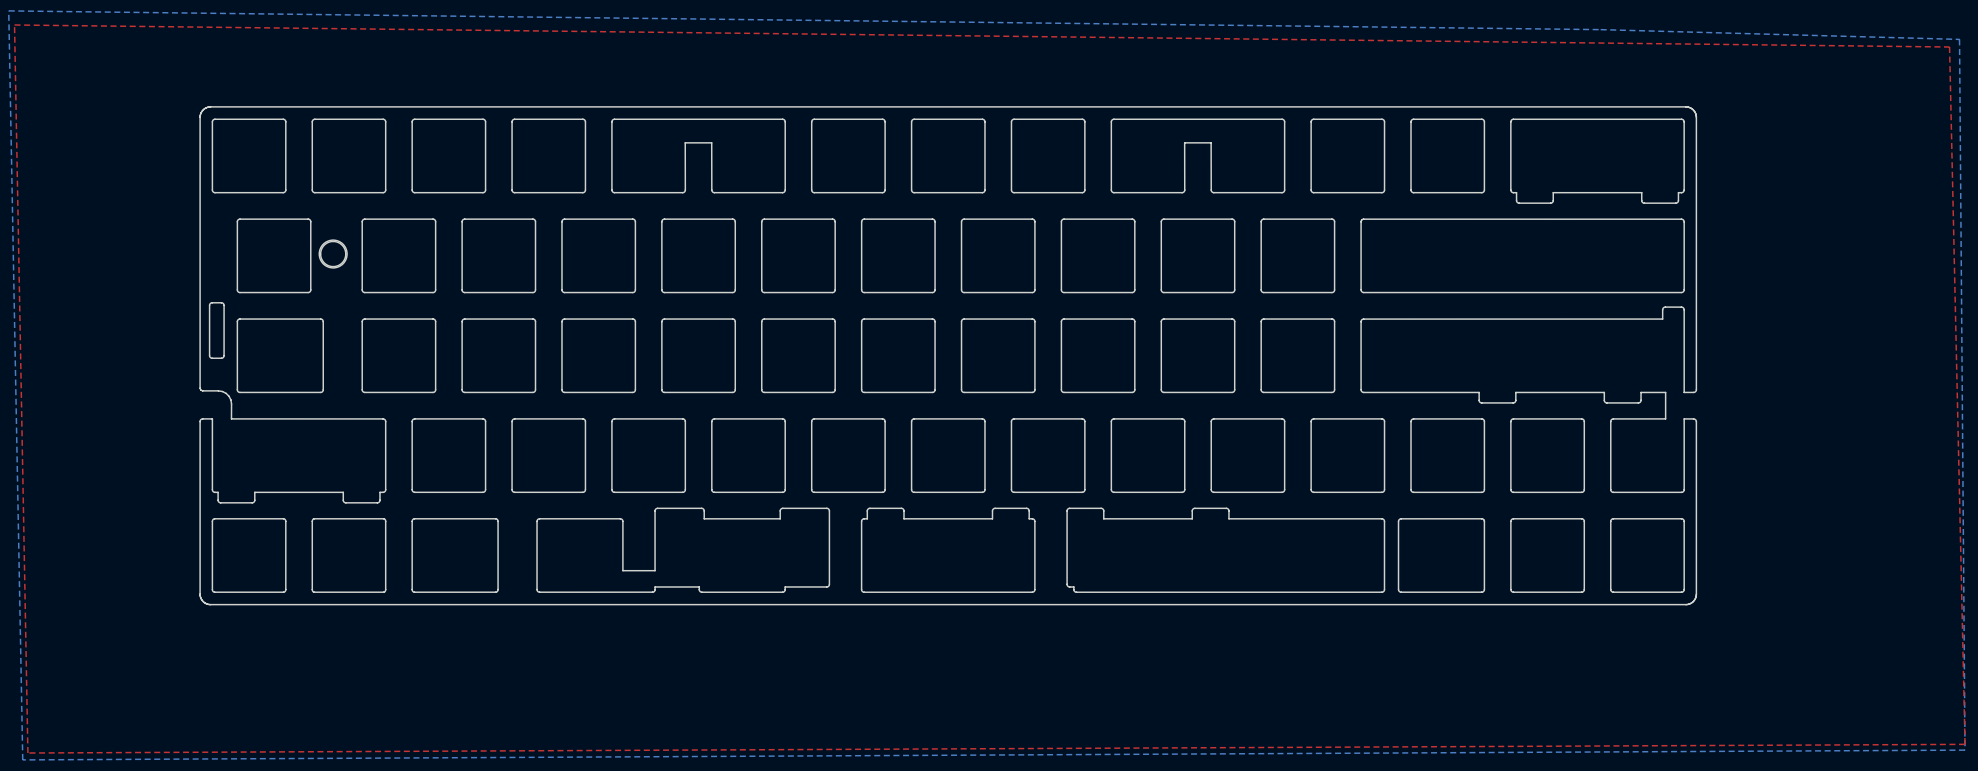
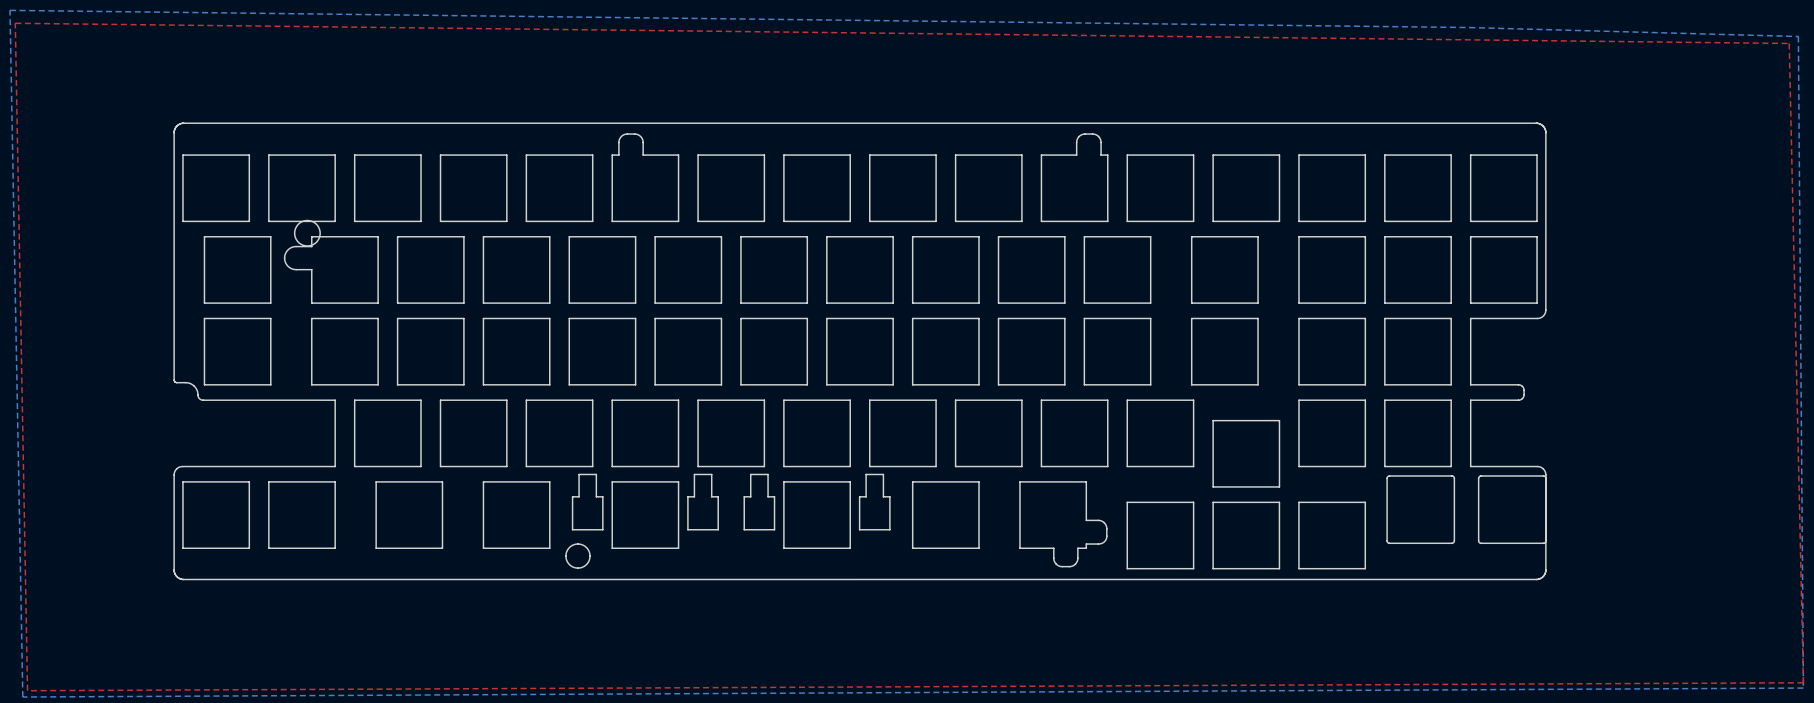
board edge: (210, 106) (1689, 107) (1694, 111) (1696, 117) (1695, 391) (1684, 392) (1684, 309) (1681, 307) (1663, 307) (1662, 319) (1363, 319) (1361, 321) (1361, 389) (1363, 392) (1479, 392) (1479, 400) (1481, 402) (1513, 402) (1515, 392) (1604, 392) (1606, 402) (1638, 402) (1640, 400) (1641, 392) (1665, 392) (1665, 418) (1611, 420) (1610, 489) (1613, 492) (1683, 491) (1684, 418) (1695, 419) (1695, 597) (1692, 602) (1685, 604) (207, 604) (202, 600) (200, 594) (201, 419) (212, 418) (212, 489) (218, 492) (219, 502) (252, 502) (254, 492) (343, 492) (345, 502) (377, 502) (379, 500) (379, 492) (384, 492) (385, 489) (384, 419) (231, 418) (230, 399) (226, 393) (200, 390) (200, 117) (203, 109) (210, 106) -> (182, 123) (176, 126) (174, 132) (174, 381) (192, 384) (196, 389) (198, 397) (202, 400) (335, 400) (335, 466) (182, 466) (177, 468) (174, 474) (174, 569) (175, 575) (180, 579) (1536, 579) (1541, 577) (1545, 572) (1545, 475) (1544, 469) (1537, 466) (1470, 466) (1470, 400) (1519, 400) (1524, 394) (1523, 387) (1519, 384) (1470, 384) (1470, 318) (1538, 318) (1542, 316) (1545, 311) (1545, 132) (1544, 127) (1539, 123) (182, 123)
board edge: (215, 119) (285, 120) (285, 191) (213, 191) (212, 121) (215, 119) -> none
board edge: (314, 119) (384, 120) (384, 191) (313, 191) (312, 121) (314, 119) -> none
board edge: (414, 119) (484, 120) (484, 191) (412, 191) (412, 121) (414, 119) -> none
board edge: (514, 119) (584, 120) (584, 191) (512, 191) (512, 121) (514, 119) -> none
board edge: (614, 119) (783, 119) (785, 121) (785, 191) (782, 192) (713, 192) (711, 190) (711, 142) (685, 142) (684, 192) (613, 192) (611, 190) (611, 121) (614, 119) -> none
board edge: (814, 119) (884, 120) (884, 191) (812, 191) (811, 121) (814, 119) -> none
board edge: (914, 119) (984, 120) (984, 191) (912, 191) (911, 121) (914, 119) -> none
board edge: (1014, 119) (1084, 120) (1084, 191) (1012, 191) (1011, 121) (1014, 119) -> none
board edge: (1113, 119) (1283, 119) (1284, 121) (1284, 191) (1282, 192) (1212, 192) (1211, 190) (1211, 142) (1184, 142) (1183, 192) (1112, 192) (1111, 190) (1111, 121) (1113, 119) -> none
board edge: (1313, 119) (1383, 120) (1383, 191) (1311, 191) (1311, 121) (1313, 119) -> none
board edge: (1413, 119) (1483, 120) (1483, 191) (1411, 191) (1411, 121) (1413, 119) -> none
board edge: (1513, 119) (1682, 119) (1684, 121) (1683, 191) (1678, 192) (1678, 201) (1676, 203) (1643, 203) (1641, 192) (1553, 192) (1551, 203) (1518, 202) (1516, 192) (1510, 190) (1510, 121) (1513, 119) -> none
board edge: none -> (627, 134) (636, 134) (641, 137) (643, 155) (678, 155) (678, 221) (612, 221) (612, 155) (618, 155) (619, 139) (627, 134)
board edge: none -> (1085, 134) (1098, 136) (1100, 141) (1101, 155) (1107, 155) (1107, 221) (1041, 221) (1041, 155) (1076, 155) (1077, 139) (1085, 134)
board edge: none -> (182, 155) (182, 221) (249, 221) (249, 155) (182, 155)
board edge: none -> (268, 155) (268, 221) (335, 221) (335, 155) (268, 155)
board edge: none -> (354, 155) (354, 221) (421, 221) (421, 155) (354, 155)
board edge: none -> (440, 155) (440, 221) (506, 221) (506, 155) (440, 155)
board edge: none -> (526, 155) (526, 221) (592, 221) (592, 155) (526, 155)
board edge: none -> (698, 155) (698, 221) (764, 221) (764, 155) (698, 155)
board edge: none -> (783, 155) (783, 221) (850, 221) (850, 155) (783, 155)
board edge: none -> (869, 155) (869, 221) (936, 221) (936, 155) (869, 155)
board edge: none -> (955, 155) (955, 221) (1021, 221) (1021, 155) (955, 155)
board edge: none -> (1127, 155) (1127, 221) (1193, 221) (1193, 155) (1127, 155)
board edge: none -> (1213, 155) (1213, 221) (1279, 221) (1279, 155) (1213, 155)
board edge: none -> (1298, 155) (1298, 221) (1365, 221) (1365, 155) (1298, 155)
board edge: none -> (1384, 155) (1384, 221) (1451, 221) (1451, 155) (1384, 155)
board edge: none -> (1470, 155) (1470, 221) (1537, 221) (1537, 155) (1470, 155)
board edge: (239, 219) (310, 219) (310, 291) (238, 291) (237, 221) (239, 219) -> none
board edge: (364, 219) (434, 219) (434, 291) (362, 291) (362, 221) (364, 219) -> none
board edge: (464, 219) (534, 219) (534, 291) (462, 291) (462, 221) (464, 219) -> none
board edge: (564, 219) (634, 219) (634, 291) (562, 291) (561, 221) (564, 219) -> none
board edge: (664, 219) (734, 219) (734, 291) (662, 291) (661, 221) (664, 219) -> none
board edge: (764, 219) (834, 219) (834, 291) (762, 291) (761, 221) (764, 219) -> none
board edge: (864, 219) (934, 219) (934, 291) (862, 291) (861, 221) (864, 219) -> none
board edge: (964, 219) (1034, 219) (1034, 291) (962, 291) (961, 221) (964, 219) -> none
board edge: (1064, 219) (1134, 219) (1134, 291) (1062, 291) (1061, 221) (1064, 219) -> none
board edge: (1163, 219) (1233, 219) (1233, 291) (1162, 291) (1161, 221) (1163, 219) -> none
board edge: (1263, 219) (1333, 219) (1333, 291) (1261, 291) (1261, 221) (1263, 219) -> none
board edge: (1363, 219) (1361, 221) (1361, 289) (1363, 292) (1681, 292) (1684, 290) (1684, 221) (1681, 219) (1363, 219) -> none
board edge: (333, 241) (342, 245) (345, 254) (342, 262) (333, 266) (324, 262) (320, 254) (324, 245) (333, 241) -> none
board edge: none -> (204, 236) (270, 236) (270, 303) (204, 303) (204, 236)
board edge: none -> (311, 236) (378, 236) (378, 303) (311, 303) (311, 269) (291, 268) (286, 264) (284, 258) (286, 251) (291, 247) (311, 246) (311, 236)
board edge: none -> (397, 236) (397, 303) (463, 303) (463, 236) (397, 236)
board edge: none -> (483, 236) (549, 236) (549, 303) (483, 303) (483, 236)
board edge: none -> (569, 236) (635, 236) (635, 303) (569, 303) (569, 236)
board edge: none -> (655, 236) (721, 236) (721, 303) (655, 303) (655, 236)
board edge: none -> (740, 236) (807, 236) (807, 303) (740, 303) (740, 236)
board edge: none -> (826, 236) (893, 236) (893, 303) (826, 303) (826, 236)
board edge: none -> (912, 236) (912, 303) (979, 303) (979, 236) (912, 236)
board edge: none -> (998, 236) (1064, 236) (1064, 303) (998, 303) (998, 236)
board edge: none -> (1084, 236) (1150, 236) (1150, 303) (1084, 303) (1084, 236)
board edge: none -> (1191, 236) (1258, 236) (1258, 303) (1191, 303) (1191, 236)
board edge: none -> (1299, 236) (1365, 236) (1365, 303) (1299, 303) (1299, 236)
board edge: none -> (1384, 236) (1451, 236) (1451, 303) (1384, 303) (1384, 236)
board edge: none -> (1470, 236) (1537, 236) (1537, 303) (1470, 303) (1470, 236)
board edge: (212, 302) (209, 305) (209, 356) (211, 358) (221, 358) (224, 355) (224, 304) (221, 302) (212, 302) -> none
board edge: (239, 319) (322, 319) (322, 391) (238, 391) (237, 321) (239, 319) -> none
board edge: (364, 319) (434, 319) (434, 391) (362, 391) (362, 321) (364, 319) -> none
board edge: (464, 319) (534, 319) (534, 391) (462, 391) (462, 321) (464, 319) -> none
board edge: (564, 319) (634, 319) (634, 391) (562, 391) (561, 321) (564, 319) -> none
board edge: (664, 319) (734, 319) (734, 391) (662, 391) (661, 321) (664, 319) -> none
board edge: (764, 319) (834, 319) (834, 391) (762, 391) (761, 321) (764, 319) -> none
board edge: (864, 319) (934, 319) (934, 391) (862, 391) (861, 321) (864, 319) -> none
board edge: (964, 319) (1034, 319) (1034, 391) (962, 391) (961, 321) (964, 319) -> none
board edge: (1064, 319) (1134, 319) (1134, 391) (1062, 391) (1061, 321) (1064, 319) -> none
board edge: (1163, 319) (1233, 319) (1233, 391) (1162, 391) (1161, 321) (1163, 319) -> none
board edge: (1263, 319) (1333, 319) (1333, 391) (1261, 391) (1261, 321) (1263, 319) -> none
board edge: none -> (204, 318) (270, 318) (270, 384) (204, 384) (204, 318)
board edge: none -> (311, 318) (378, 318) (378, 384) (311, 384) (311, 318)
board edge: none -> (397, 318) (463, 318) (463, 384) (397, 384) (397, 318)
board edge: none -> (483, 318) (549, 318) (549, 384) (483, 384) (483, 318)
board edge: none -> (569, 318) (635, 318) (635, 384) (569, 384) (569, 318)
board edge: none -> (655, 318) (721, 318) (721, 384) (655, 384) (655, 318)
board edge: none -> (740, 318) (807, 318) (807, 384) (740, 384) (740, 318)
board edge: none -> (826, 318) (893, 318) (893, 384) (826, 384) (826, 318)
board edge: none -> (912, 318) (979, 318) (979, 384) (912, 384) (912, 318)
board edge: none -> (998, 318) (1064, 318) (1064, 384) (998, 384) (998, 318)
board edge: none -> (1084, 318) (1150, 318) (1150, 384) (1084, 384) (1084, 318)
board edge: none -> (1191, 318) (1258, 318) (1258, 384) (1191, 384) (1191, 318)
board edge: none -> (1299, 318) (1365, 318) (1365, 384) (1299, 384) (1299, 318)
board edge: none -> (1384, 318) (1451, 318) (1451, 384) (1384, 384) (1384, 318)
board edge: (414, 418) (484, 419) (484, 491) (412, 491) (412, 421) (414, 418) -> none
board edge: (514, 418) (584, 419) (584, 491) (512, 491) (512, 421) (514, 418) -> none
board edge: (614, 418) (684, 419) (684, 491) (612, 491) (611, 421) (614, 418) -> none
board edge: (714, 418) (784, 419) (784, 491) (712, 491) (711, 421) (714, 418) -> none
board edge: (814, 418) (884, 419) (884, 491) (812, 491) (811, 421) (814, 418) -> none
board edge: (914, 418) (984, 419) (984, 491) (912, 491) (911, 421) (914, 418) -> none
board edge: (1014, 418) (1084, 419) (1084, 491) (1012, 491) (1011, 421) (1014, 418) -> none
board edge: (1113, 418) (1183, 419) (1183, 491) (1112, 491) (1111, 421) (1113, 418) -> none
board edge: (1213, 418) (1283, 419) (1283, 491) (1212, 491) (1211, 421) (1213, 418) -> none
board edge: (1313, 418) (1383, 419) (1383, 491) (1311, 491) (1311, 421) (1313, 418) -> none
board edge: (1413, 418) (1483, 419) (1483, 491) (1411, 491) (1411, 421) (1413, 418) -> (1299, 400) (1299, 466) (1365, 466) (1365, 400) (1299, 400)
board edge: (1513, 418) (1583, 419) (1583, 491) (1511, 491) (1510, 421) (1513, 418) -> (1384, 400) (1384, 466) (1451, 466) (1451, 400) (1384, 400)
board edge: none -> (354, 400) (421, 400) (421, 466) (354, 466) (354, 400)
board edge: none -> (440, 400) (506, 400) (506, 466) (440, 466) (440, 400)
board edge: none -> (526, 400) (592, 400) (592, 466) (526, 466) (526, 400)
board edge: none -> (612, 400) (678, 400) (678, 466) (612, 466) (612, 400)
board edge: none -> (698, 400) (764, 400) (764, 466) (698, 466) (698, 400)
board edge: none -> (783, 400) (850, 400) (850, 466) (783, 466) (783, 400)
board edge: none -> (869, 400) (936, 400) (936, 466) (869, 466) (869, 400)
board edge: none -> (955, 400) (1021, 400) (1021, 466) (955, 466) (955, 400)
board edge: none -> (1041, 400) (1107, 400) (1107, 466) (1041, 466) (1041, 400)
board edge: none -> (1127, 400) (1193, 400) (1193, 466) (1127, 466) (1127, 400)
board edge: none -> (1213, 420) (1279, 420) (1279, 486) (1213, 486) (1213, 420)
board edge: (657, 508) (702, 508) (704, 510) (704, 518) (780, 518) (780, 510) (782, 508) (827, 508) (829, 510) (829, 585) (826, 586) (785, 586) (782, 592) (701, 592) (699, 586) (655, 587) (652, 592) (537, 591) (538, 519) (621, 519) (622, 521) (622, 570) (655, 570) (655, 510) (657, 508) -> none
board edge: (869, 508) (902, 508) (904, 518) (992, 518) (994, 508) (1027, 508) (1029, 518) (1034, 521) (1034, 590) (862, 591) (861, 521) (867, 518) (867, 510) (869, 508) -> none
board edge: (1069, 508) (1101, 508) (1103, 518) (1192, 518) (1194, 508) (1226, 508) (1228, 510) (1228, 518) (1382, 518) (1384, 521) (1384, 590) (1381, 592) (1075, 592) (1073, 586) (1068, 586) (1067, 584) (1067, 510) (1069, 508) -> none
board edge: none -> (579, 474) (596, 474) (596, 496) (602, 496) (602, 529) (572, 529) (572, 496) (579, 496) (579, 474)
board edge: none -> (694, 474) (711, 474) (711, 496) (718, 496) (718, 529) (687, 529) (687, 496) (694, 496) (694, 474)
board edge: none -> (750, 474) (768, 474) (768, 496) (774, 496) (774, 529) (744, 529) (744, 496) (750, 496) (750, 474)
board edge: none -> (866, 474) (883, 474) (883, 496) (889, 496) (889, 529) (859, 529) (859, 496) (866, 496) (866, 474)
board edge: (214, 518) (284, 519) (284, 591) (213, 591) (212, 521) (214, 518) -> (182, 481) (182, 548) (249, 548) (249, 481) (182, 481)
board edge: (314, 518) (384, 519) (384, 591) (312, 591) (312, 521) (314, 518) -> none
board edge: (414, 518) (497, 519) (497, 591) (413, 591) (412, 521) (414, 518) -> (376, 481) (376, 548) (442, 548) (442, 481) (376, 481)
board edge: (1401, 518) (1398, 521) (1399, 591) (1483, 591) (1483, 519) (1401, 518) -> none
board edge: none -> (268, 481) (335, 481) (335, 548) (268, 548) (268, 481)
board edge: none -> (483, 481) (549, 481) (549, 548) (483, 548) (483, 481)
board edge: none -> (612, 481) (678, 481) (678, 548) (612, 548) (612, 481)
board edge: none -> (783, 481) (850, 481) (850, 548) (783, 548) (783, 481)
board edge: none -> (912, 481) (979, 481) (979, 548) (912, 548) (912, 481)
board edge: none -> (1019, 481) (1086, 481) (1086, 520) (1099, 520) (1104, 523) (1106, 528) (1105, 540) (1100, 543) (1086, 544) (1086, 548) (1077, 548) (1077, 561) (1070, 566) (1060, 566) (1056, 563) (1053, 548) (1019, 548) (1019, 481)
board edge: none -> (1127, 502) (1193, 502) (1193, 568) (1127, 568) (1127, 502)
board edge: none -> (1213, 502) (1213, 568) (1279, 568) (1279, 502) (1213, 502)
board edge: none -> (1298, 502) (1365, 502) (1365, 568) (1298, 568) (1298, 502)
board edge: none -> (577, 544) (586, 547) (590, 556) (586, 564) (577, 568) (569, 564) (565, 556) (569, 547) (577, 544)

